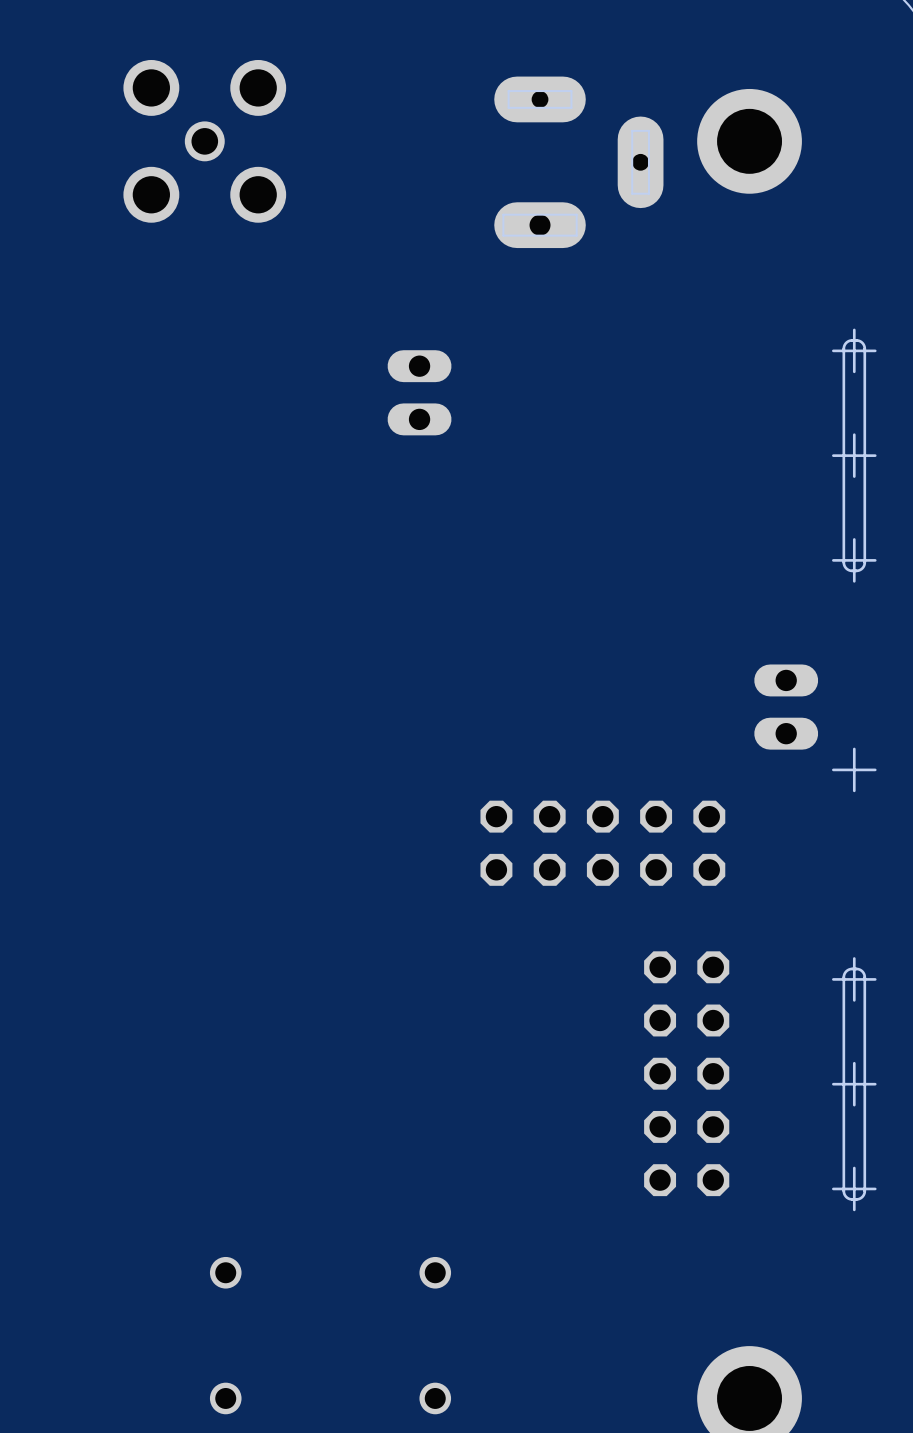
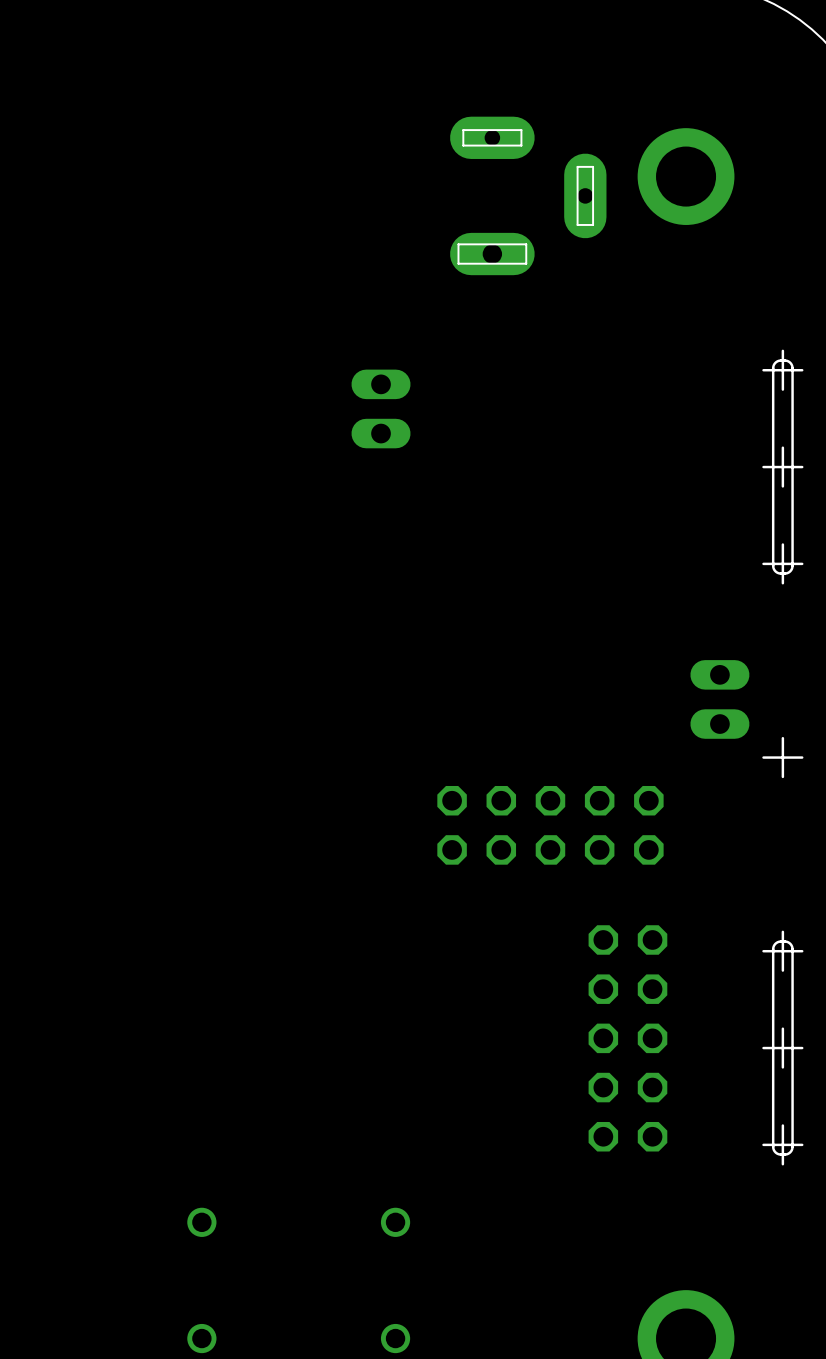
part: (204, 141) -> none

